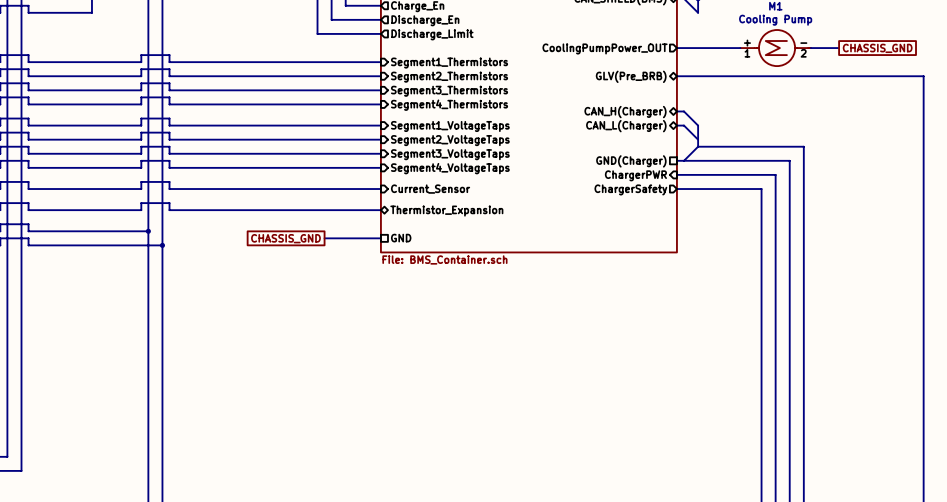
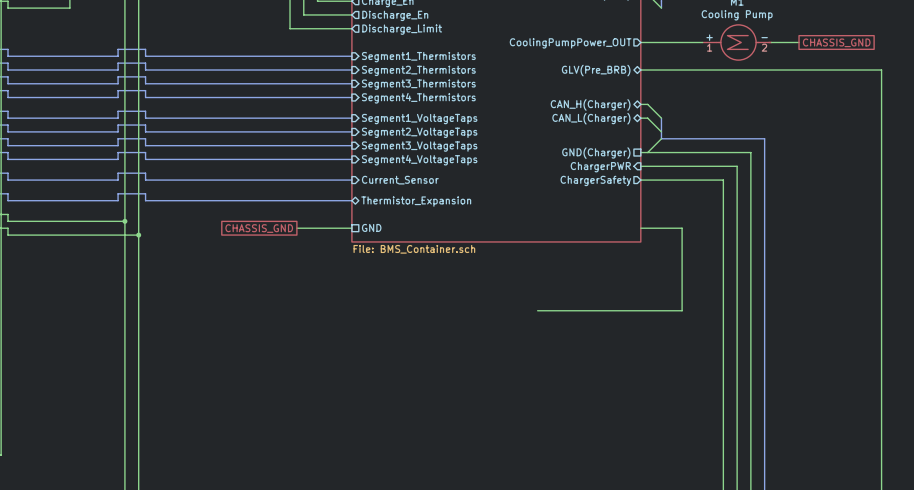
wire: none -> (640, 228) (682, 228) (682, 310) (537, 310)

